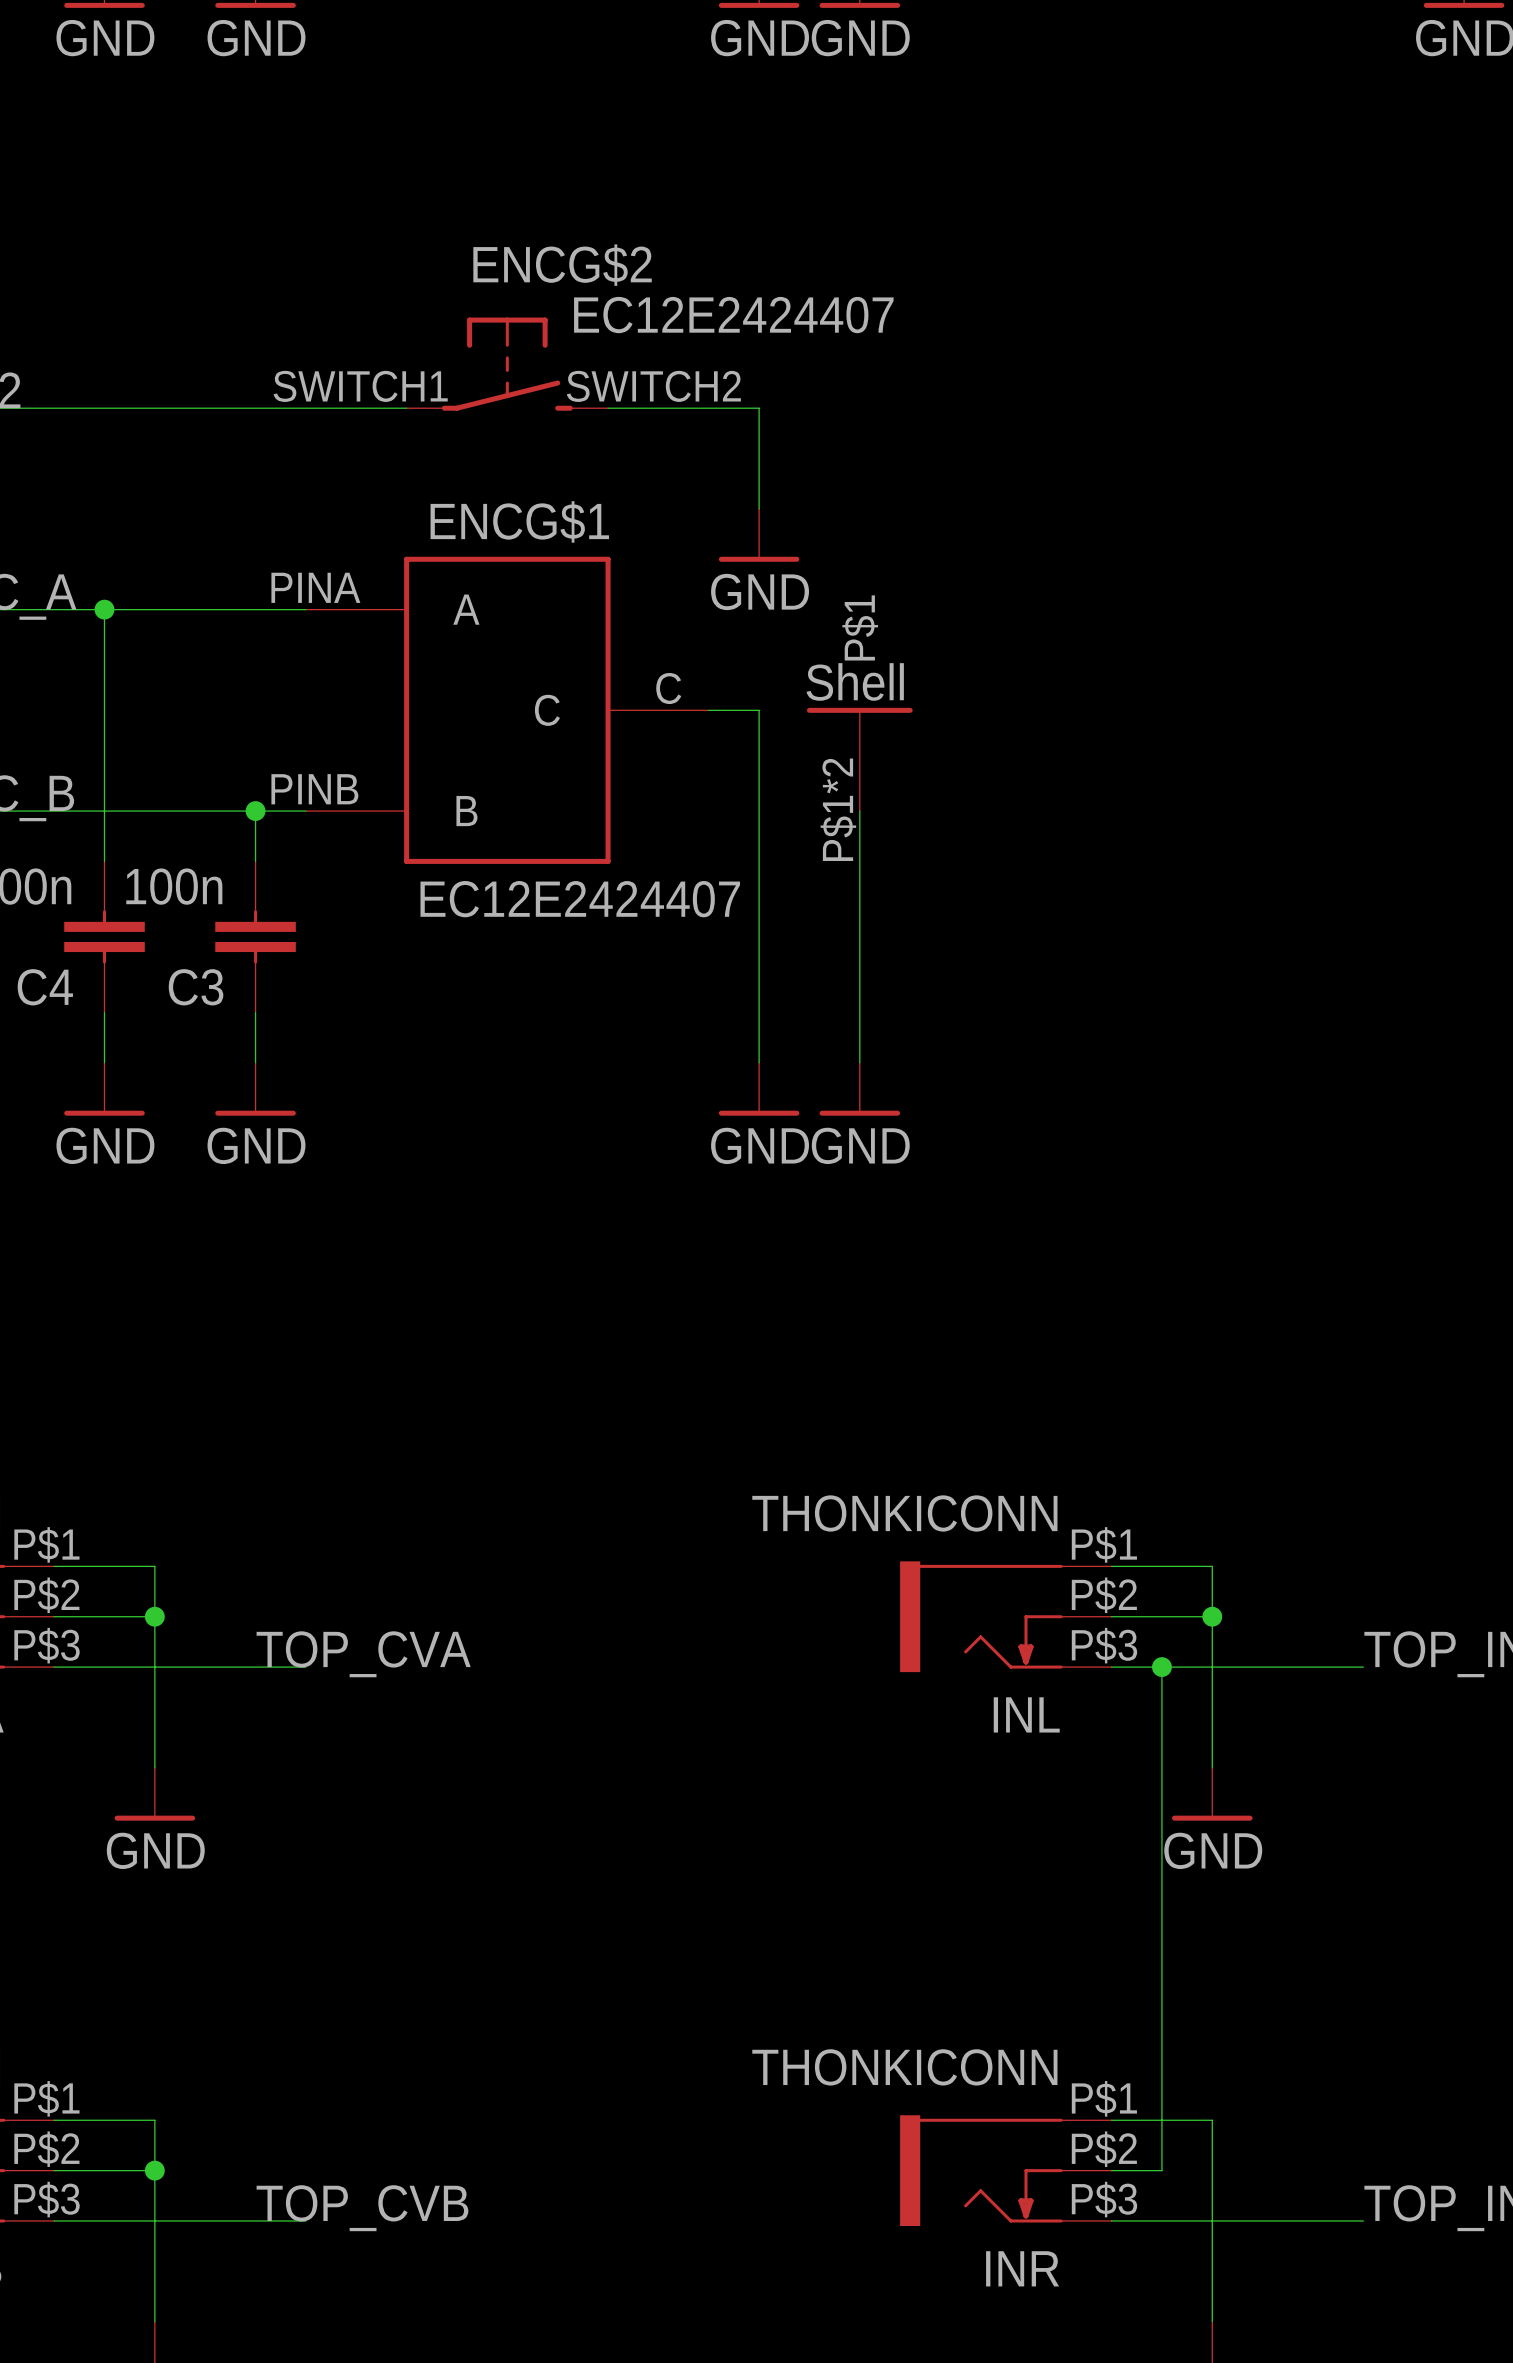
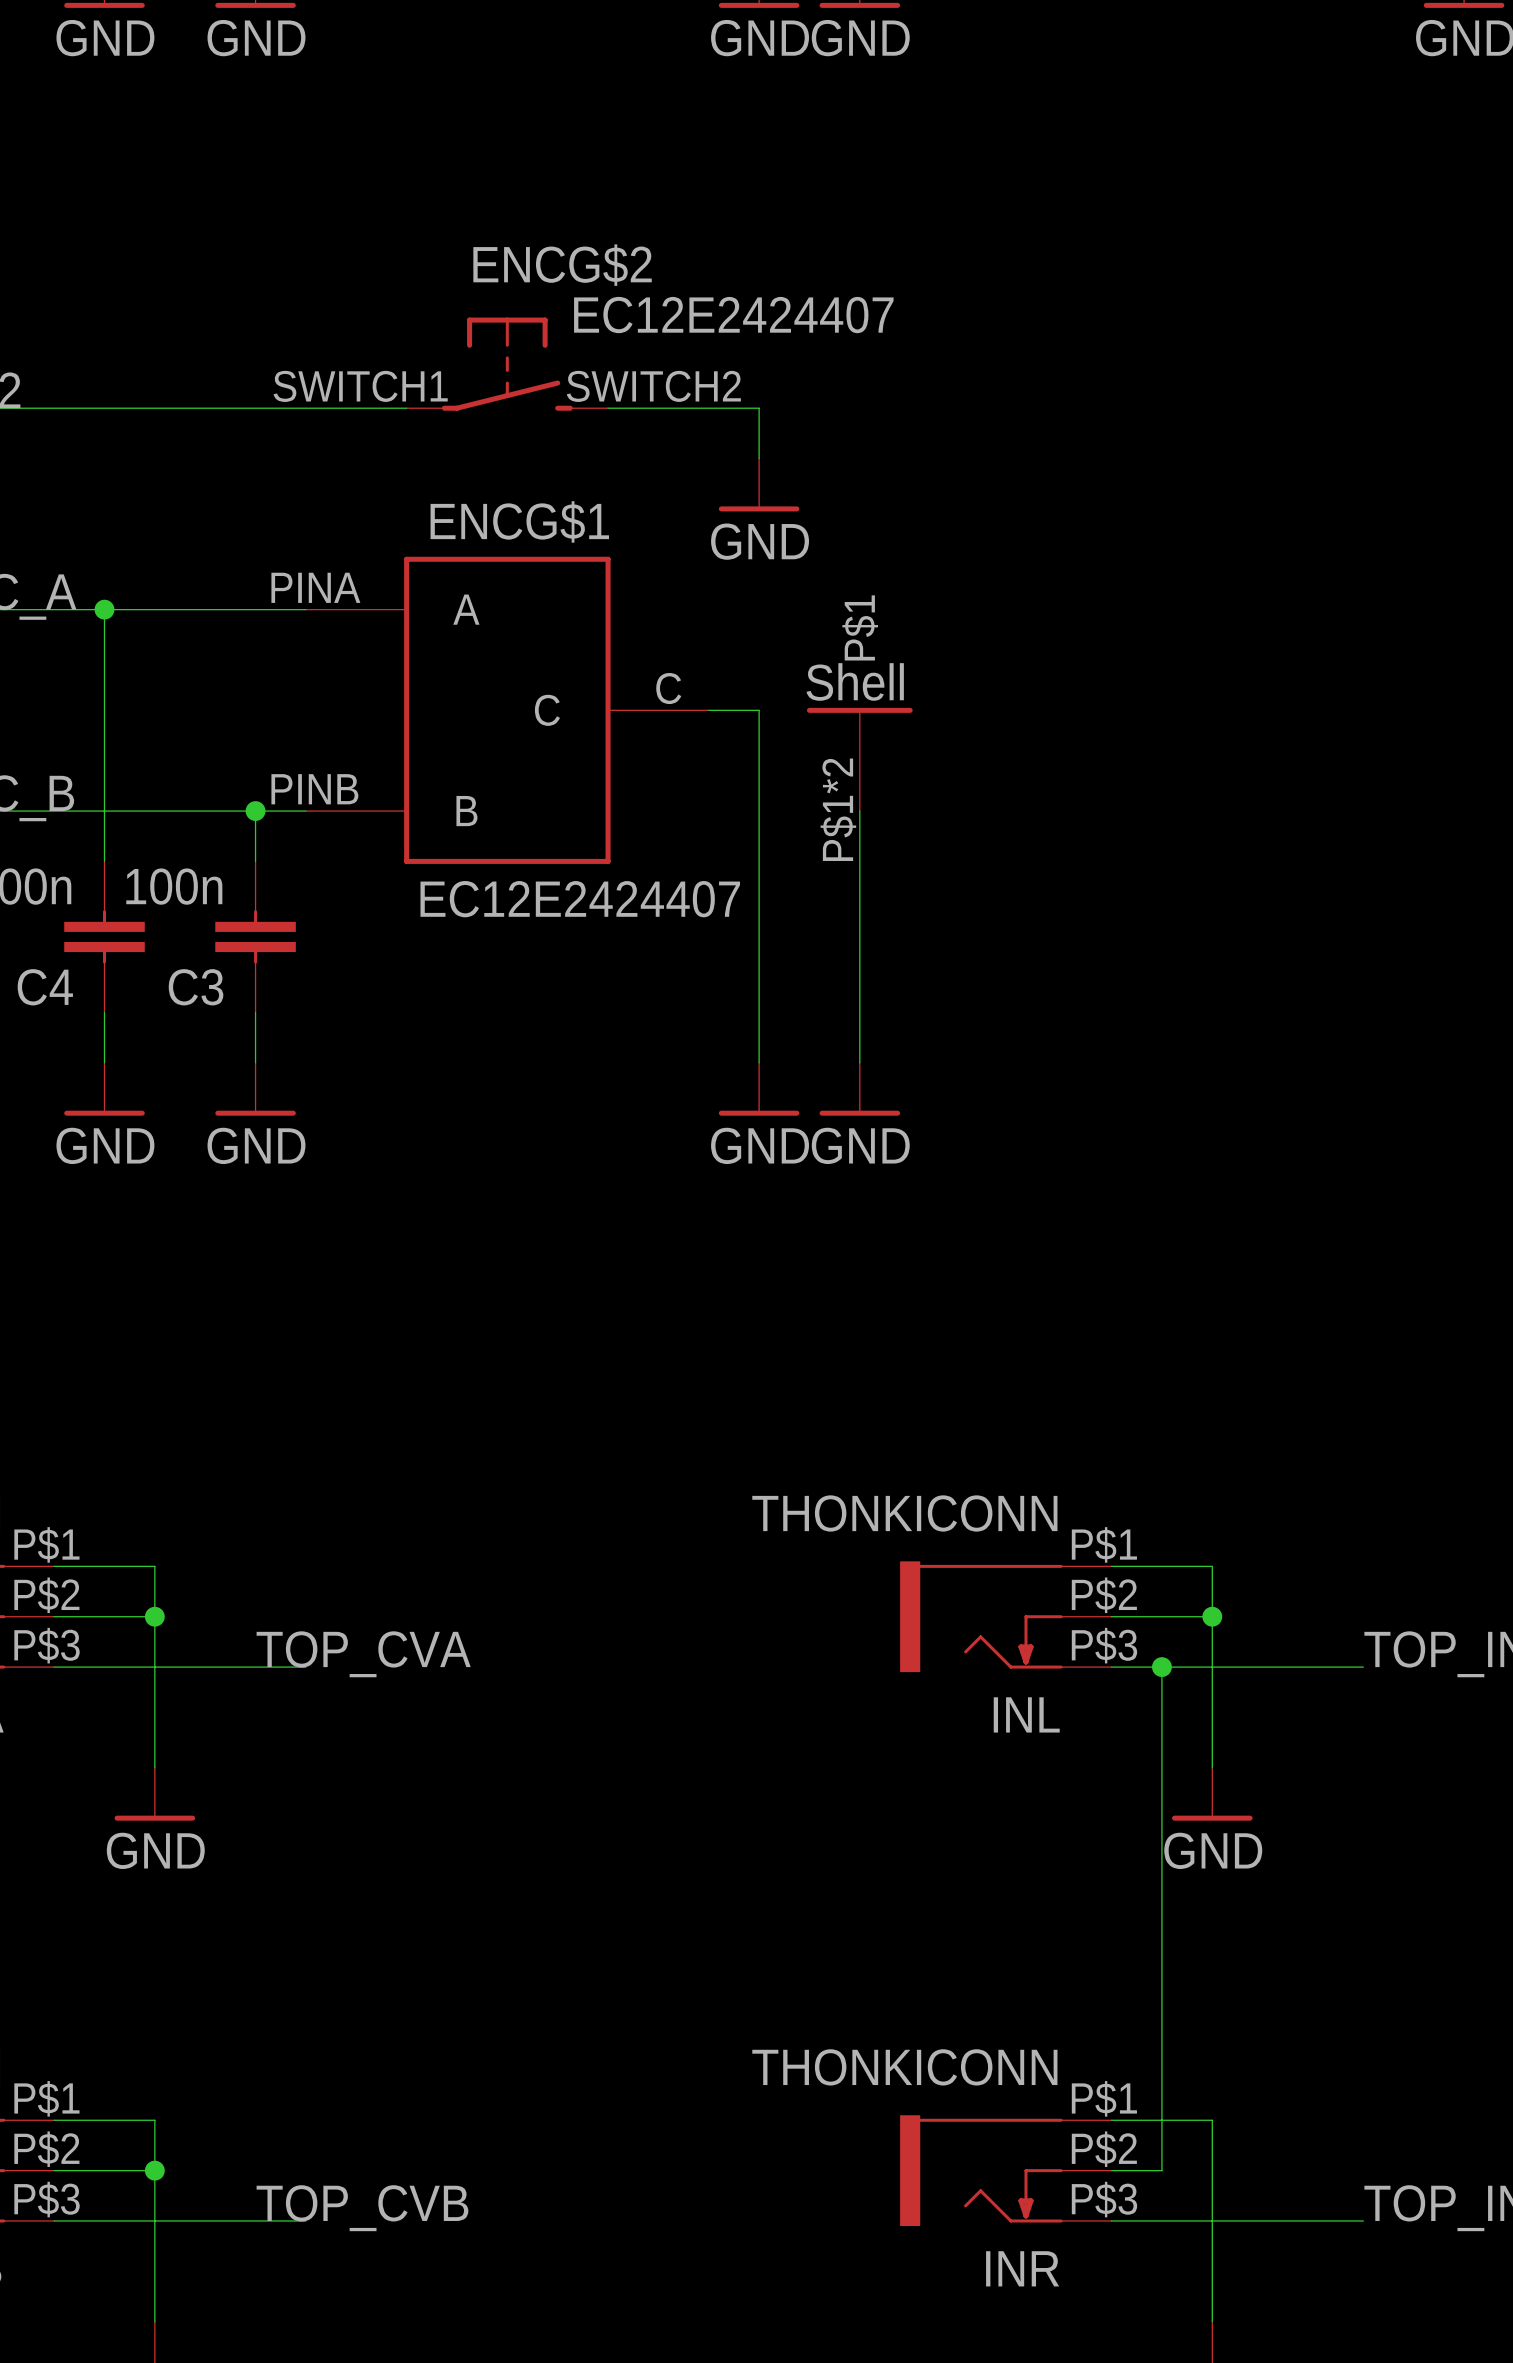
power symbol position: GND (759, 535) -> GND (759, 485)

